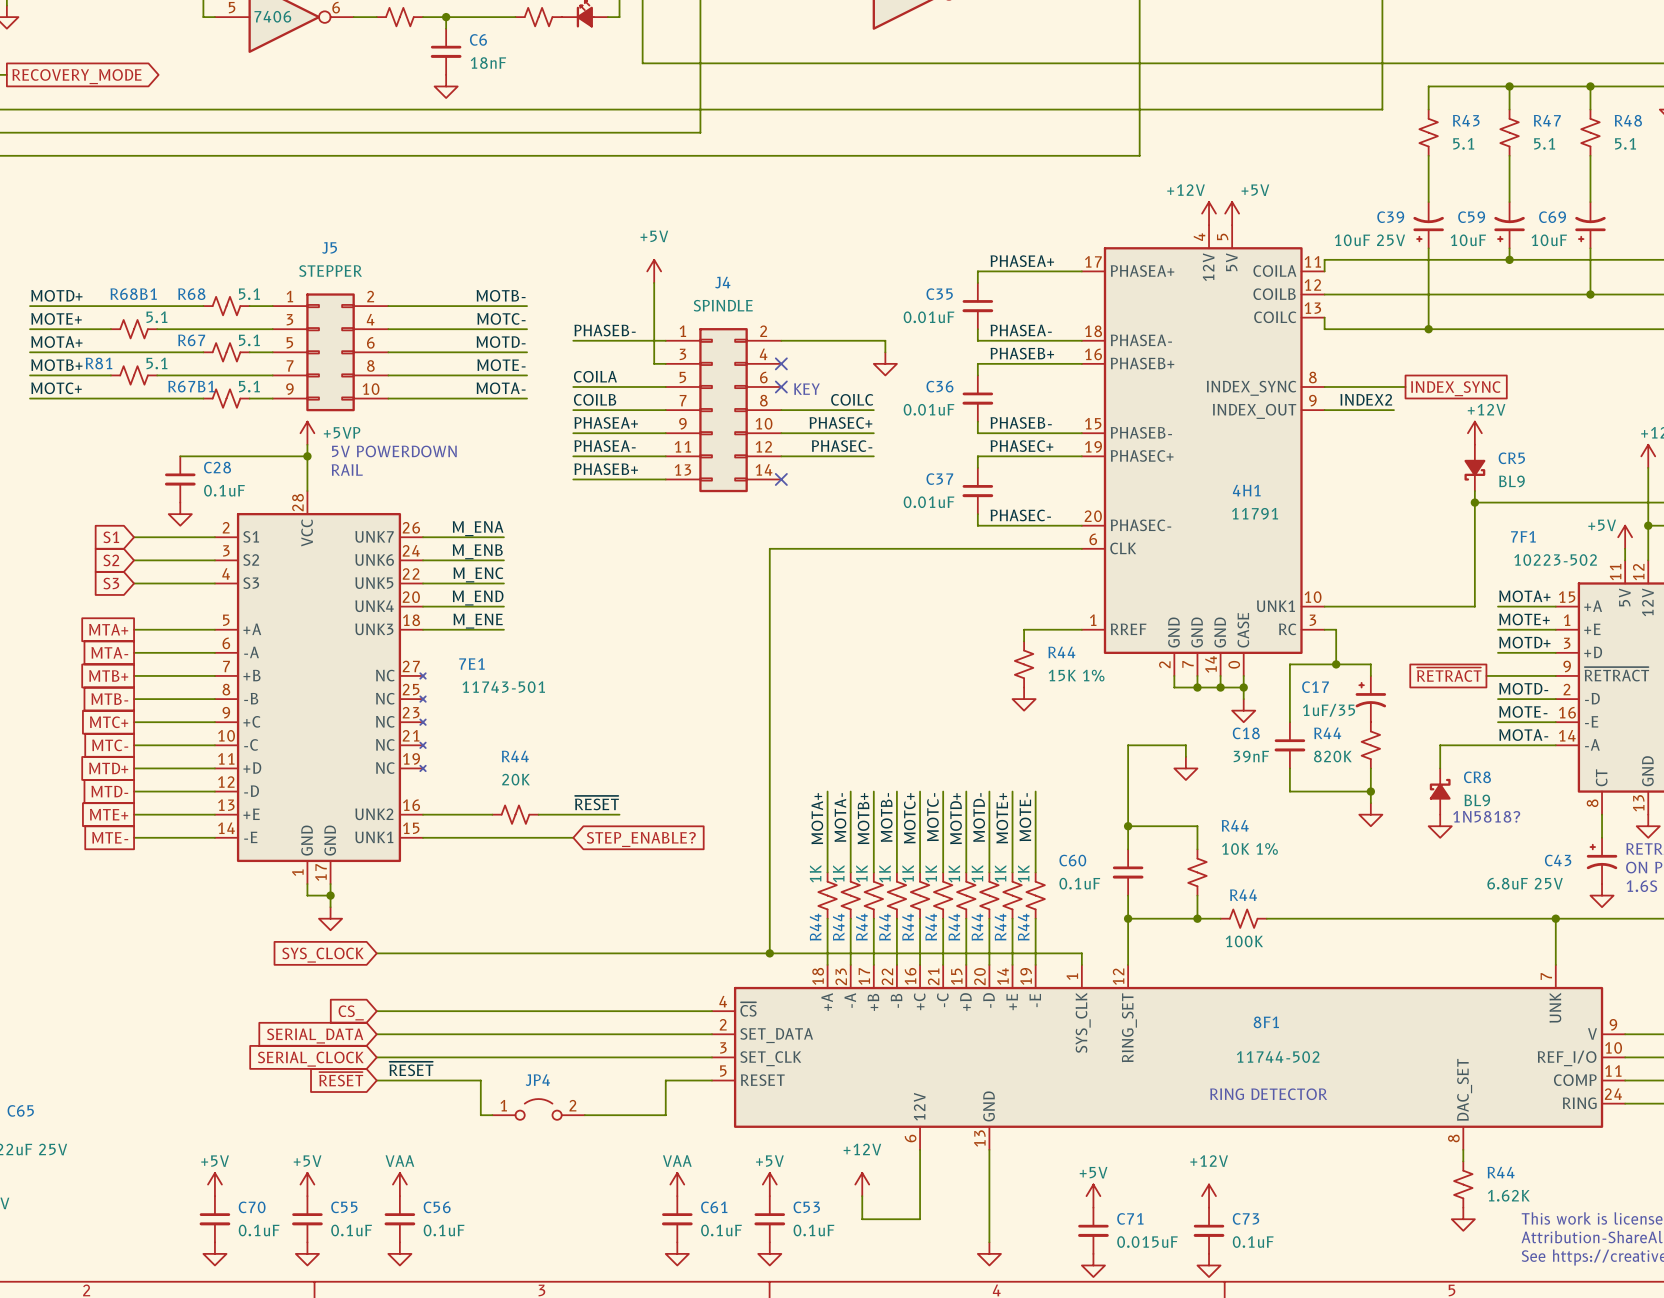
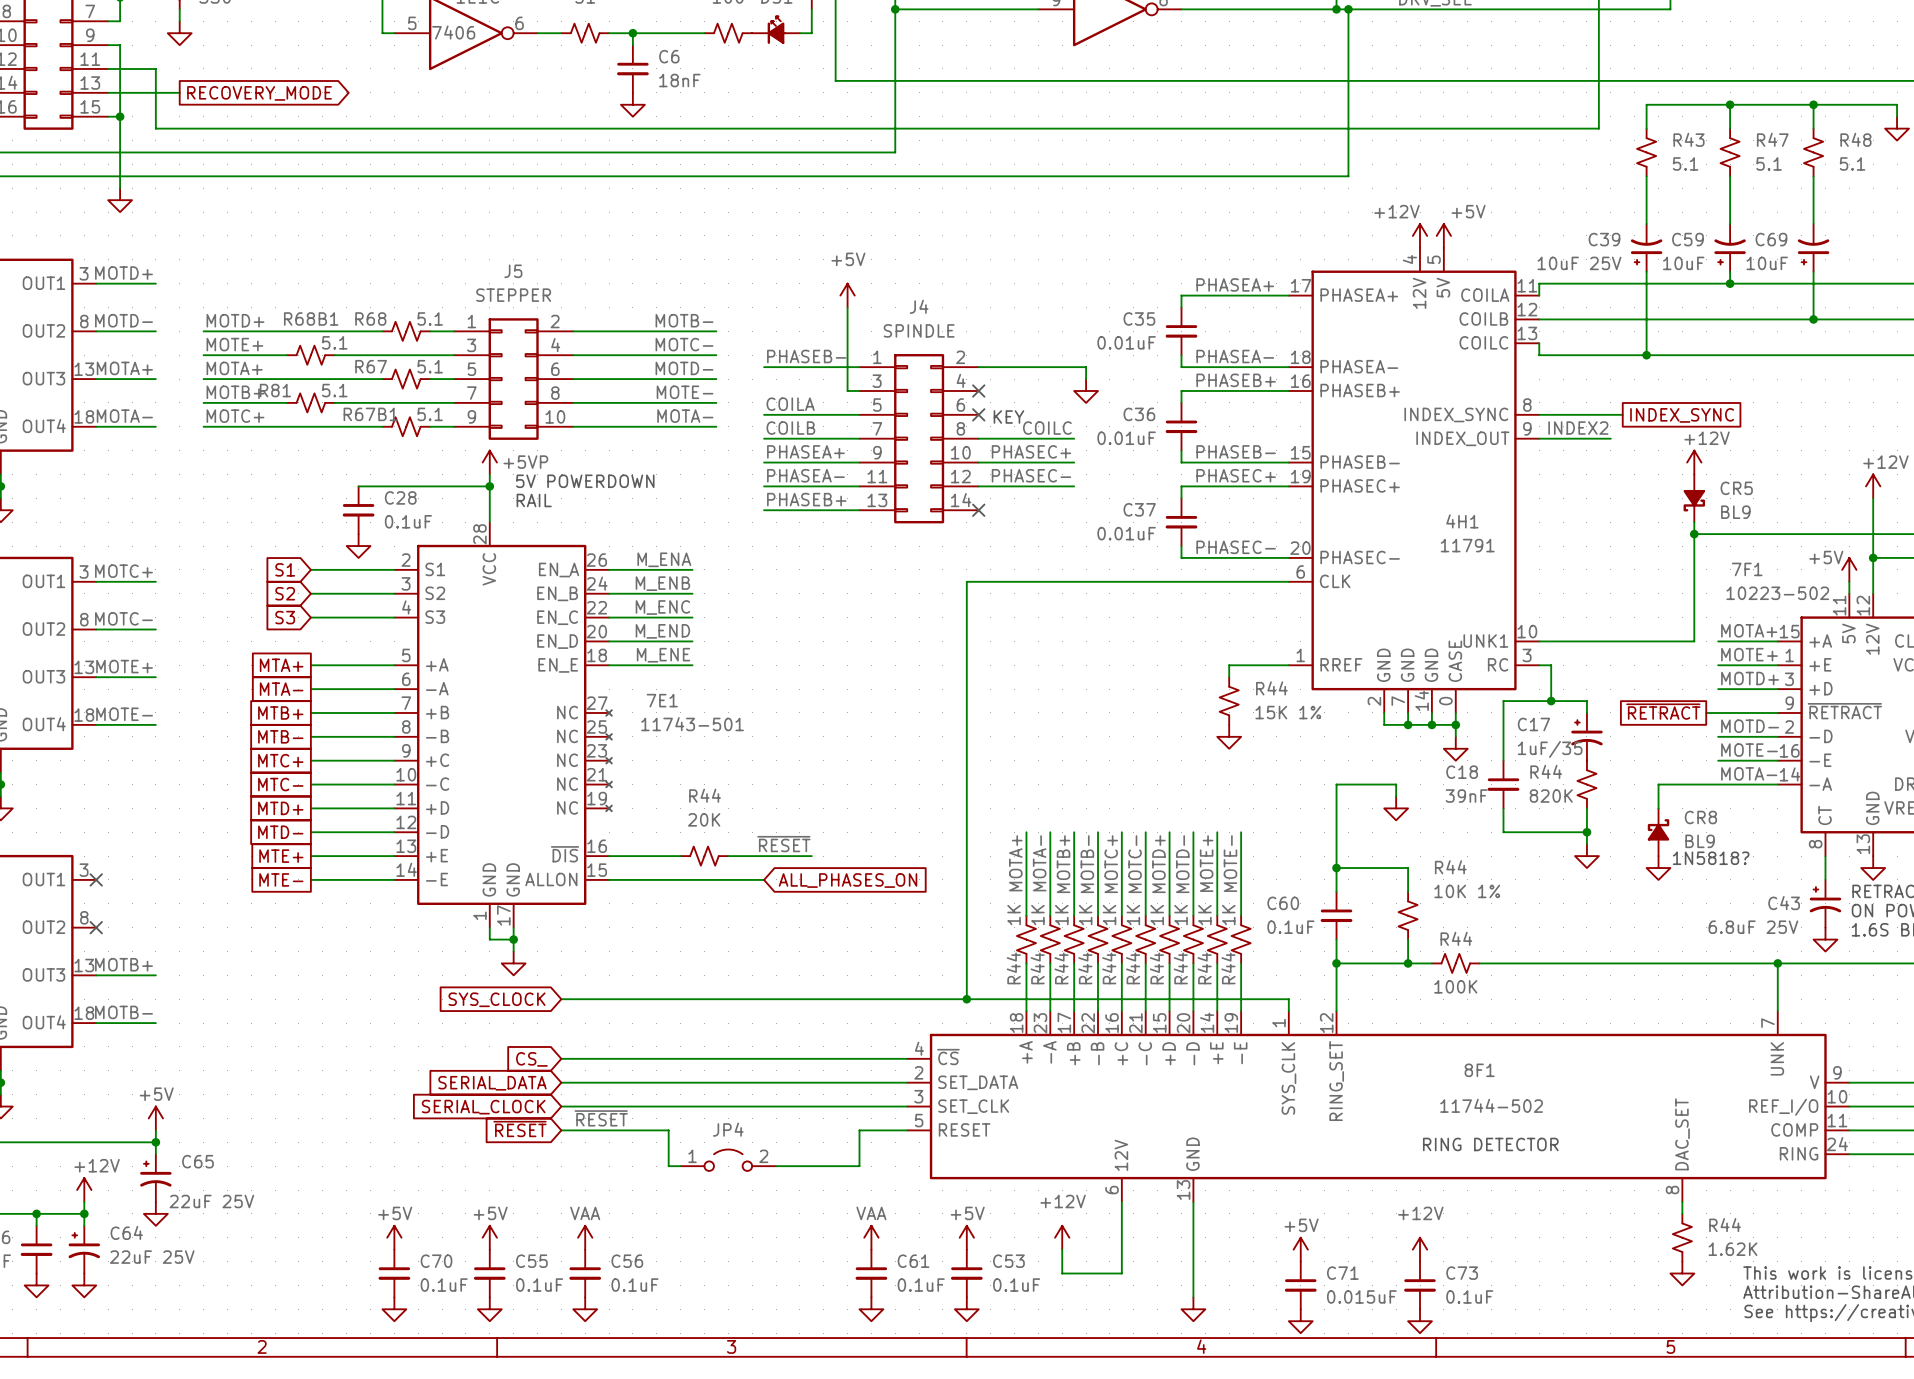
7E1 pin name: UNK7 (374, 536) -> EN_A (559, 570)
7E1 pin name: UNK6 (374, 560) -> EN_B (557, 593)
7E1 pin name: UNK5 (374, 583) -> EN_C (557, 617)
7E1 pin name: UNK4 (374, 606) -> EN_D (557, 641)
7E1 pin name: UNK3 (374, 629) -> EN_E (558, 665)
7E1 pin name: UNK2 (374, 814) -> ~{DIS} (565, 854)
7E1 pin name: UNK1 (374, 837) -> ALLON (551, 879)
global label: STEP_ENABLE? (641, 839) -> ALL_PHASES_ON (848, 880)

